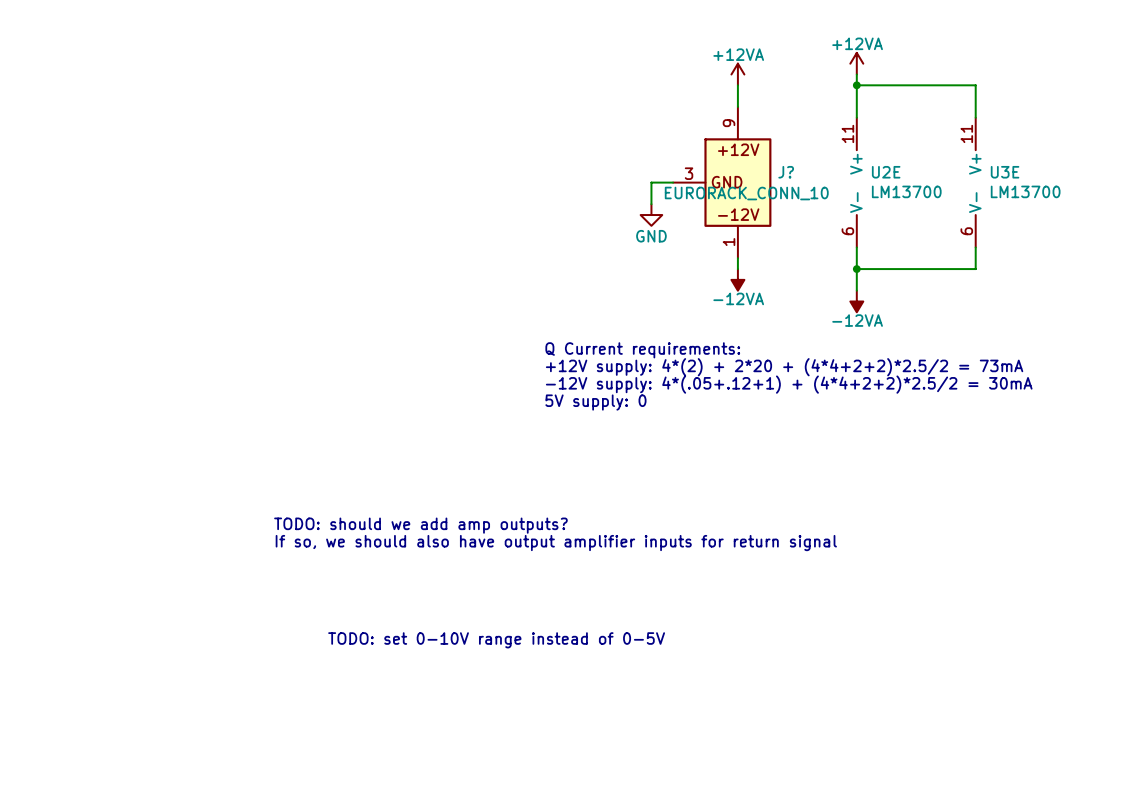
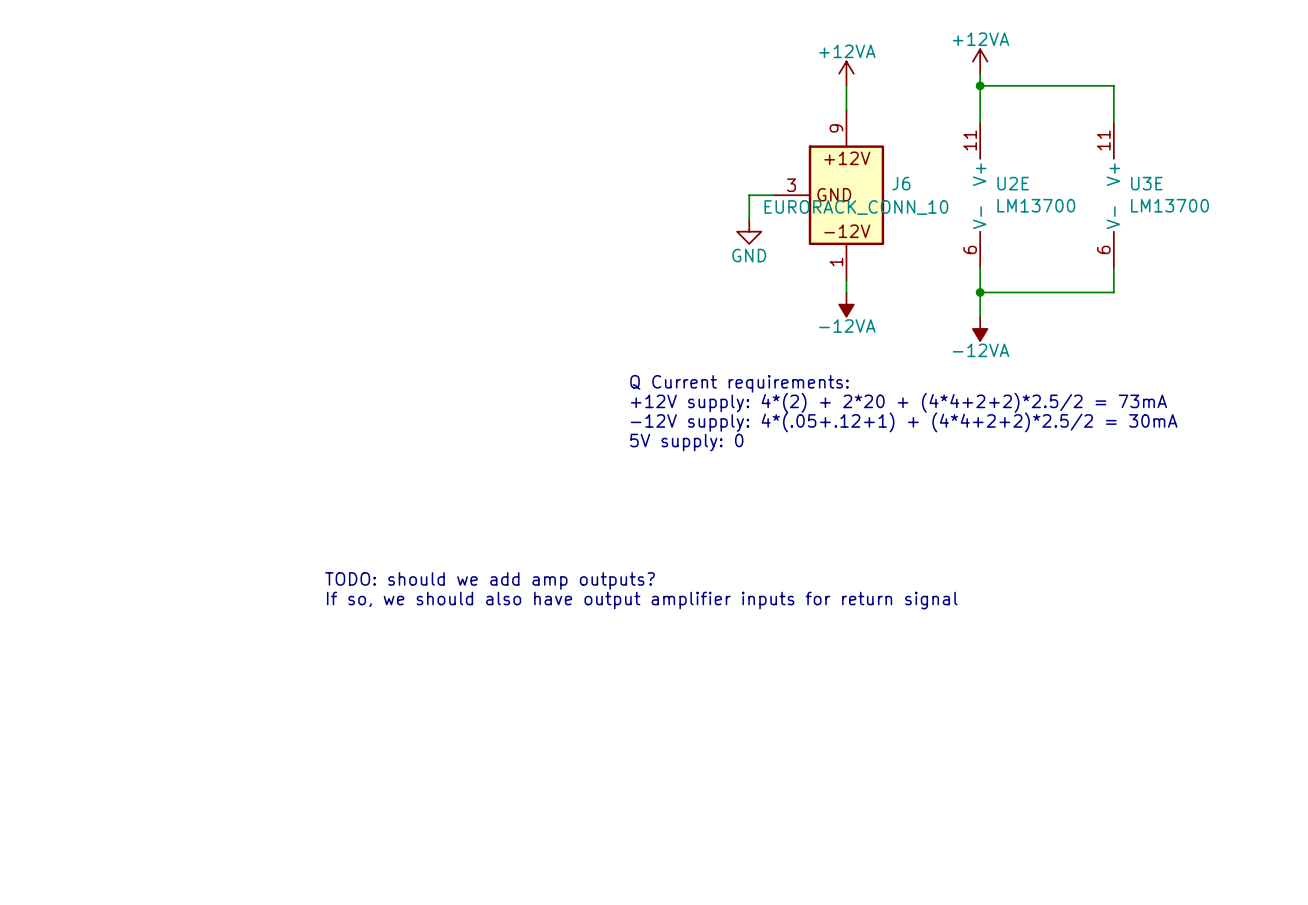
J? name: J? (786, 172) -> J6 (901, 183)
text: TODO: set 0-10V range instead of 0-5V (496, 640) -> none

